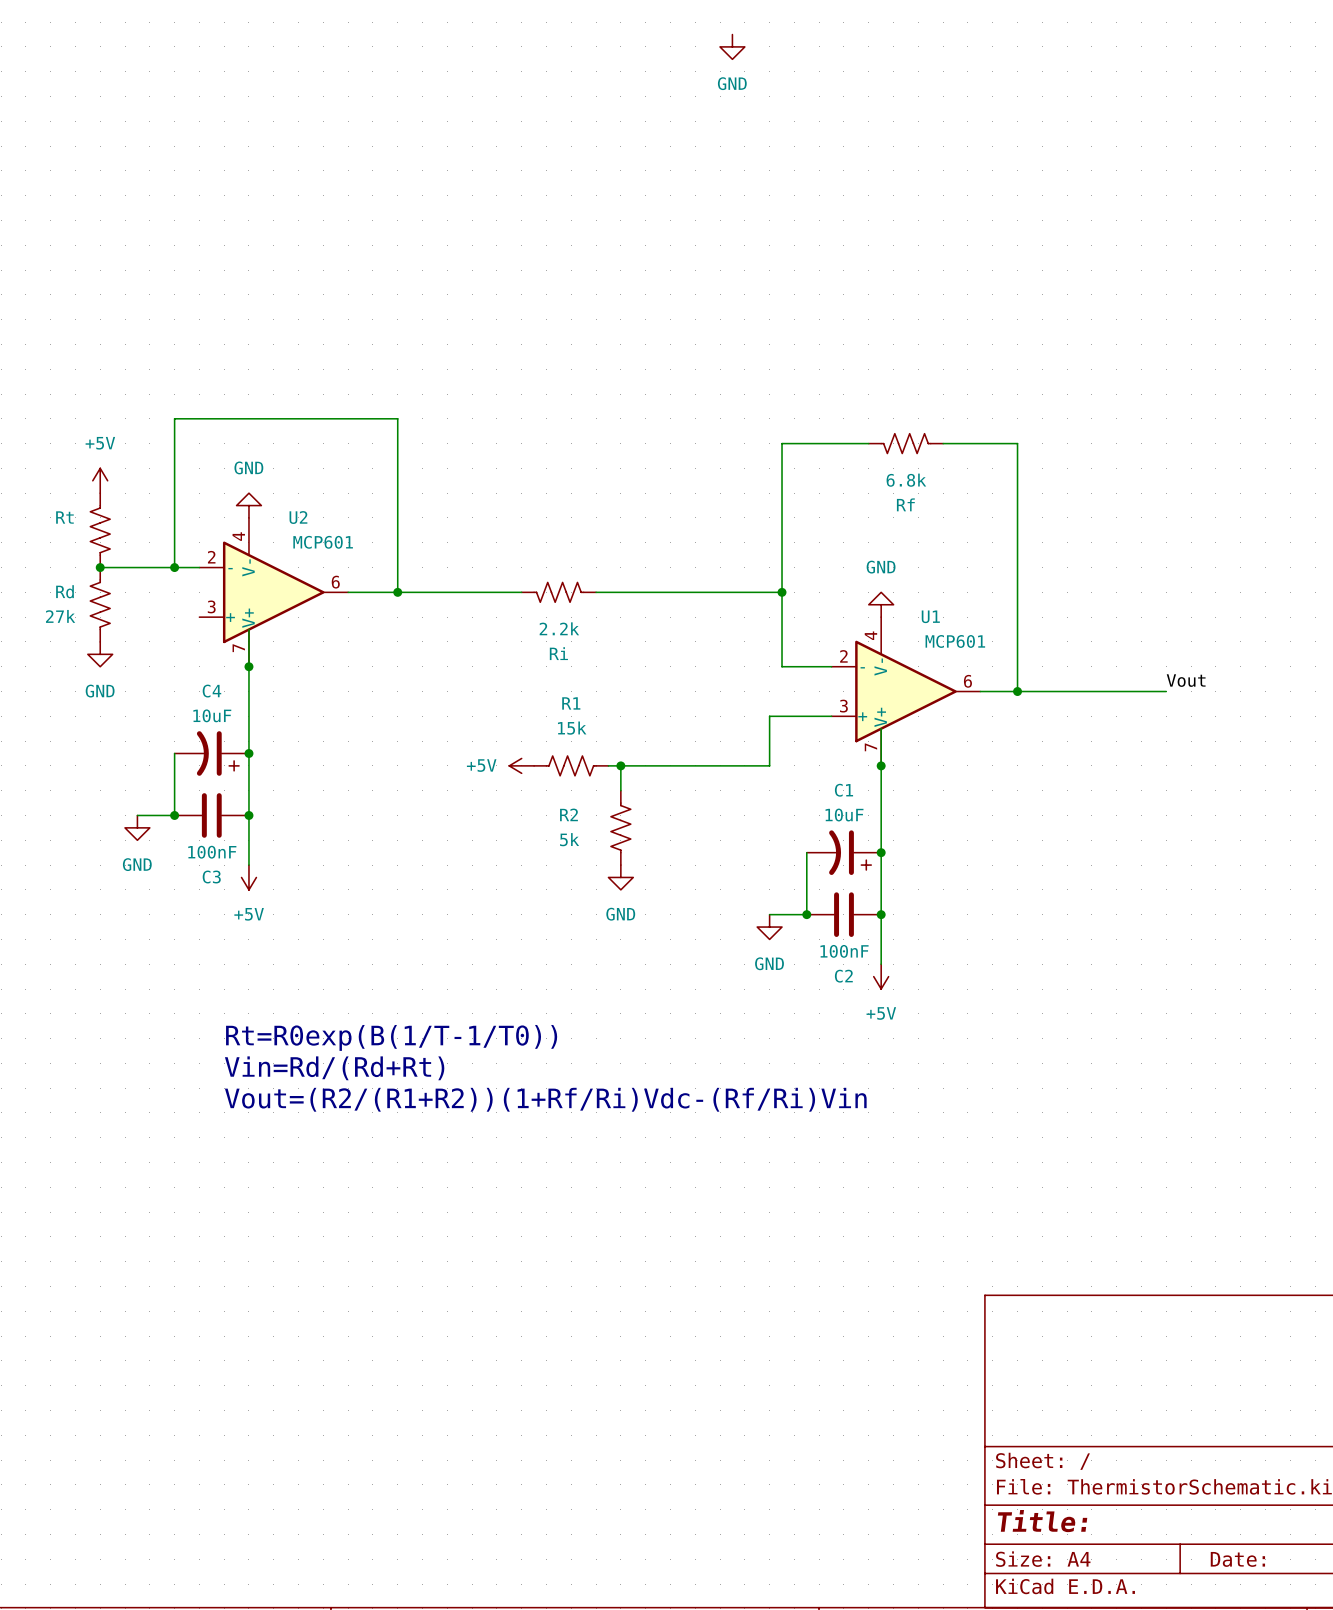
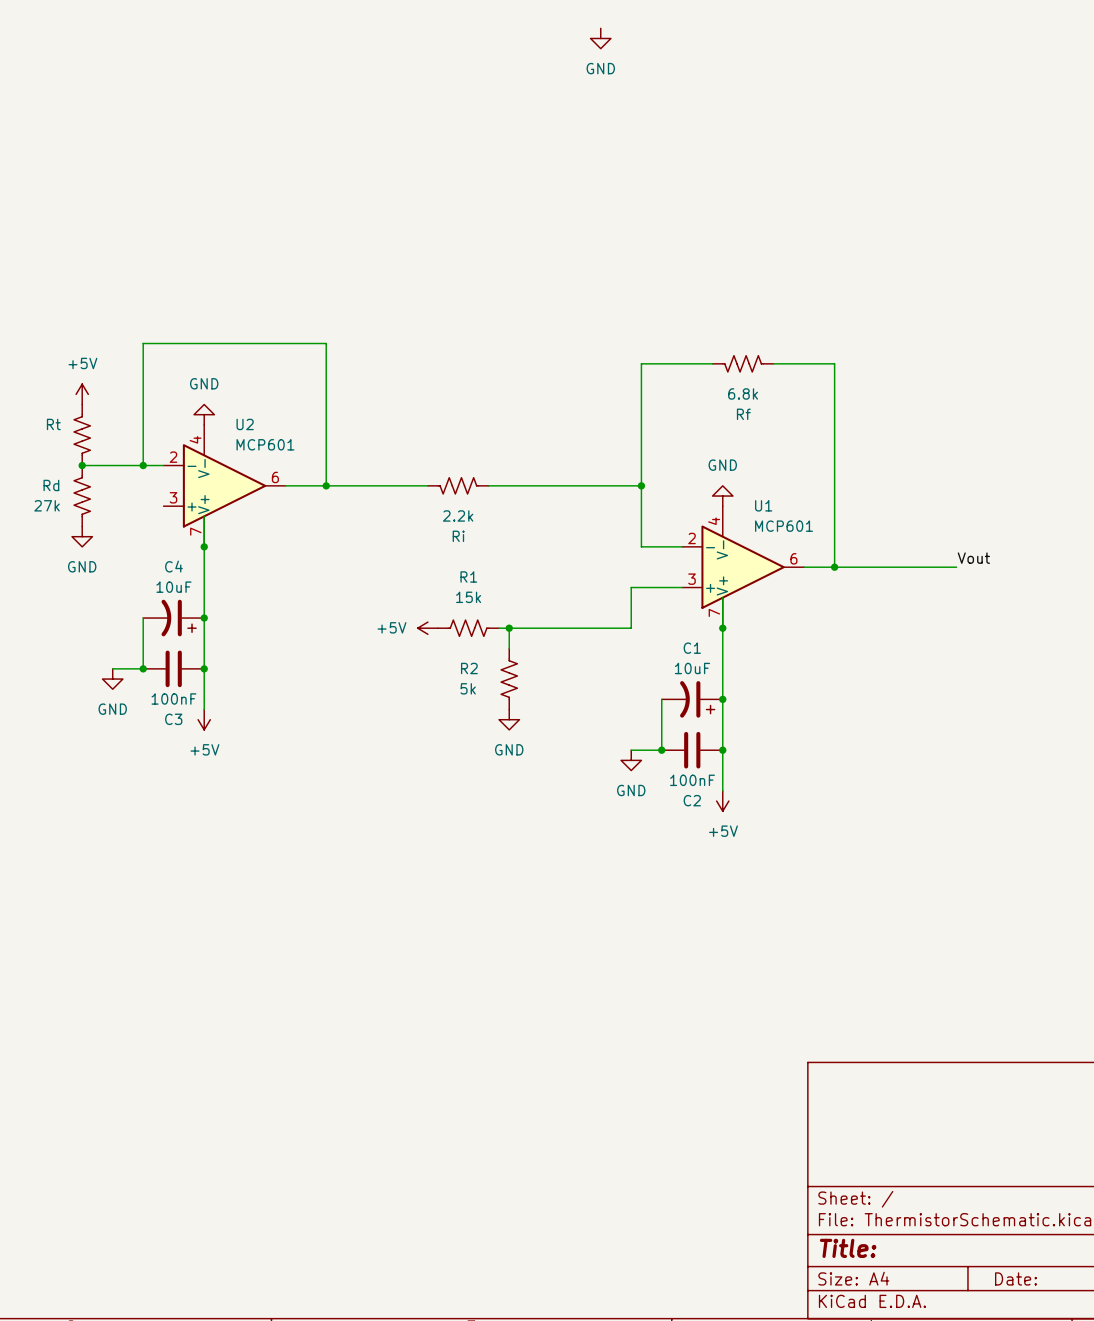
text: Rt=R0exp(B(1/T-1/T0)) (391, 1037) -> none
text: Vin=Rd/(Rd+Rt) (334, 1068) -> none
text: Vout=(R2/(R1+R2))(1+Rf/Ri)Vdc-(Rf/Ri)Vin (545, 1099) -> none

